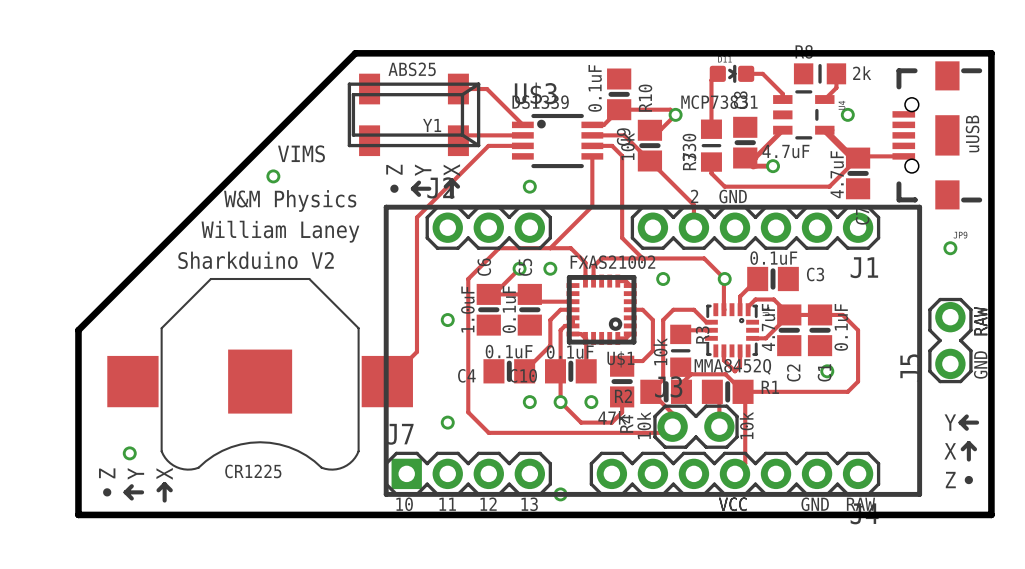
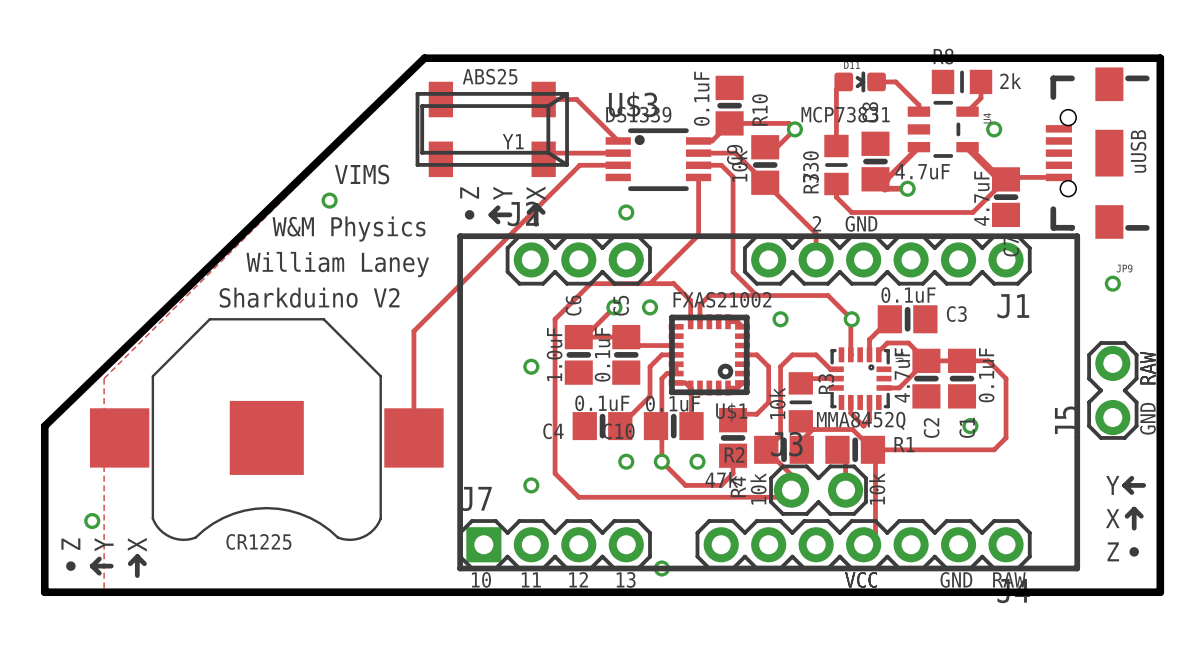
board edge: (355, 53) (78, 330) (78, 514) -> (424, 58) (44, 426) (44, 592) (104, 592)
track: (489, 145) (416, 217) (416, 351) (387, 381) -> (579, 165) (413, 331) (413, 437)
part position: (260, 374) -> (266, 429)
via position: (129, 453) -> (92, 521)
text position: CR1225 (253, 471) -> CR1225 (258, 541)
text: none -> Z (70, 544)
text: Z (107, 473) -> X (137, 544)
text position: Y (135, 473) -> Y (104, 544)
text: X (164, 473) -> none
line: (164, 484) (164, 500) -> (137, 556) (137, 575)
line: (164, 484) (158, 490) -> (137, 556) (130, 563)
line: (164, 484) (170, 490) -> (137, 556) (144, 563)
line: (131, 486) (125, 492) -> (99, 559) (92, 566)
drawing position: (107, 492) -> (70, 566)
line: (125, 492) (142, 492) -> (92, 566) (111, 566)
line: (125, 492) (131, 498) -> (92, 566) (99, 573)

